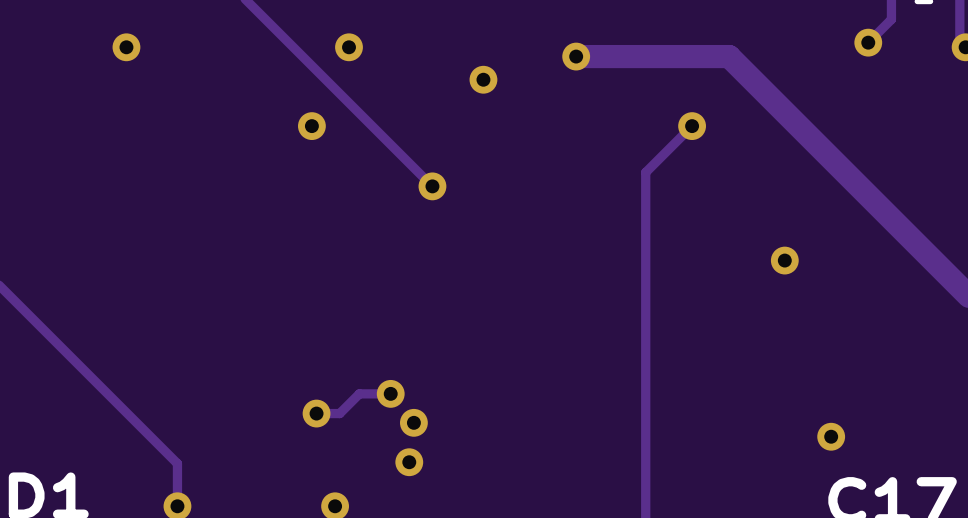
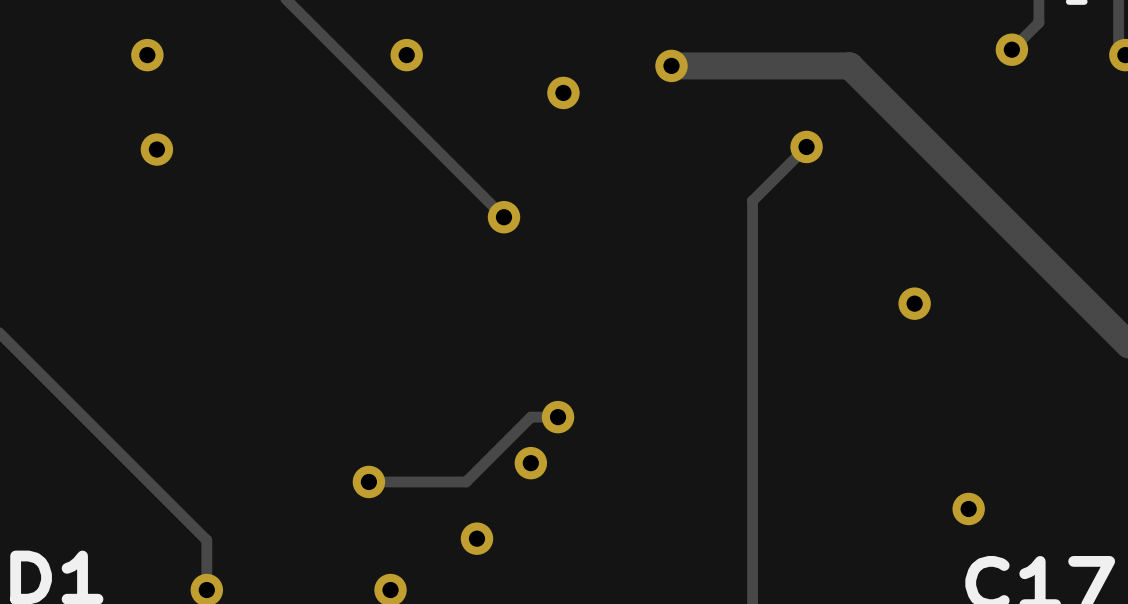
via: (311, 126) -> none
via: none -> (156, 149)
via: none -> (558, 417)
track: (390, 393) (359, 393) (339, 413) -> (558, 417) (531, 417) (466, 481) (395, 481)
via: (390, 393) -> none
via: none -> (530, 463)
via: (413, 422) -> none

